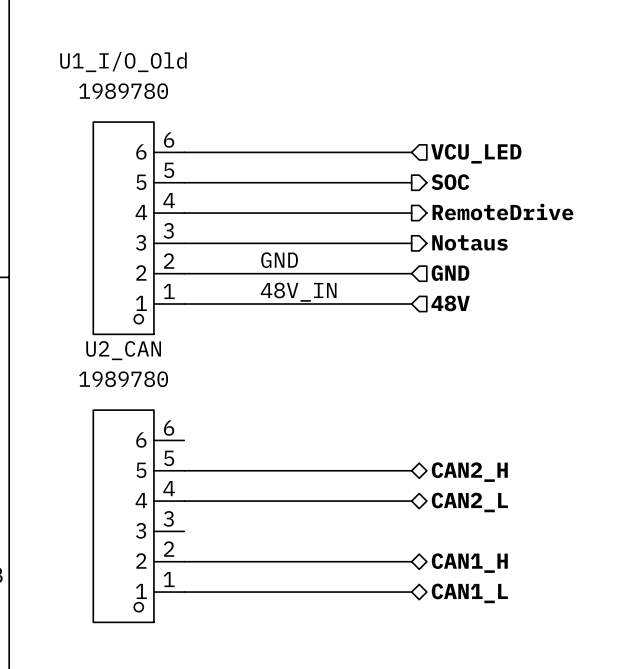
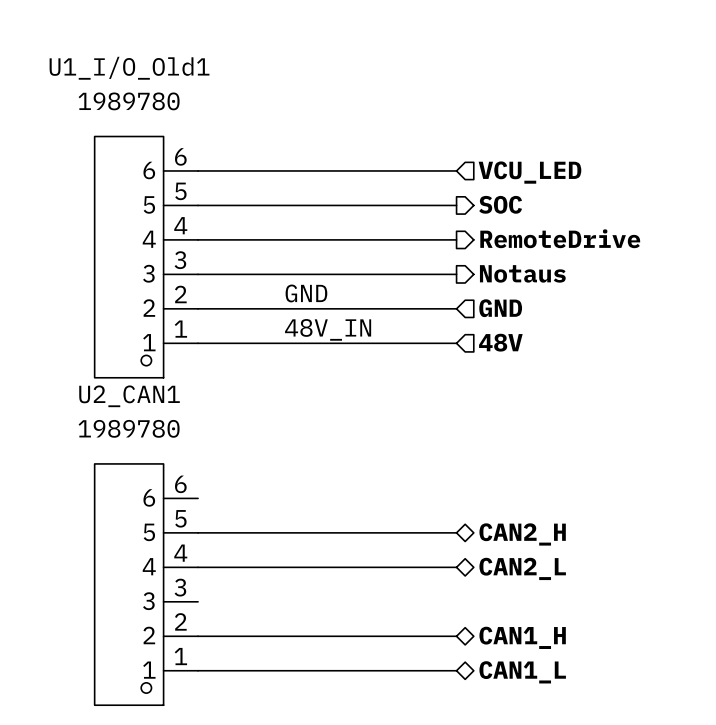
U1_I/O_Old name: U1_I/O_Old (123, 62) -> U1_I/O_Old1 (129, 68)
U2_CAN name: U2_CAN (123, 350) -> U2_CAN1 (129, 396)

